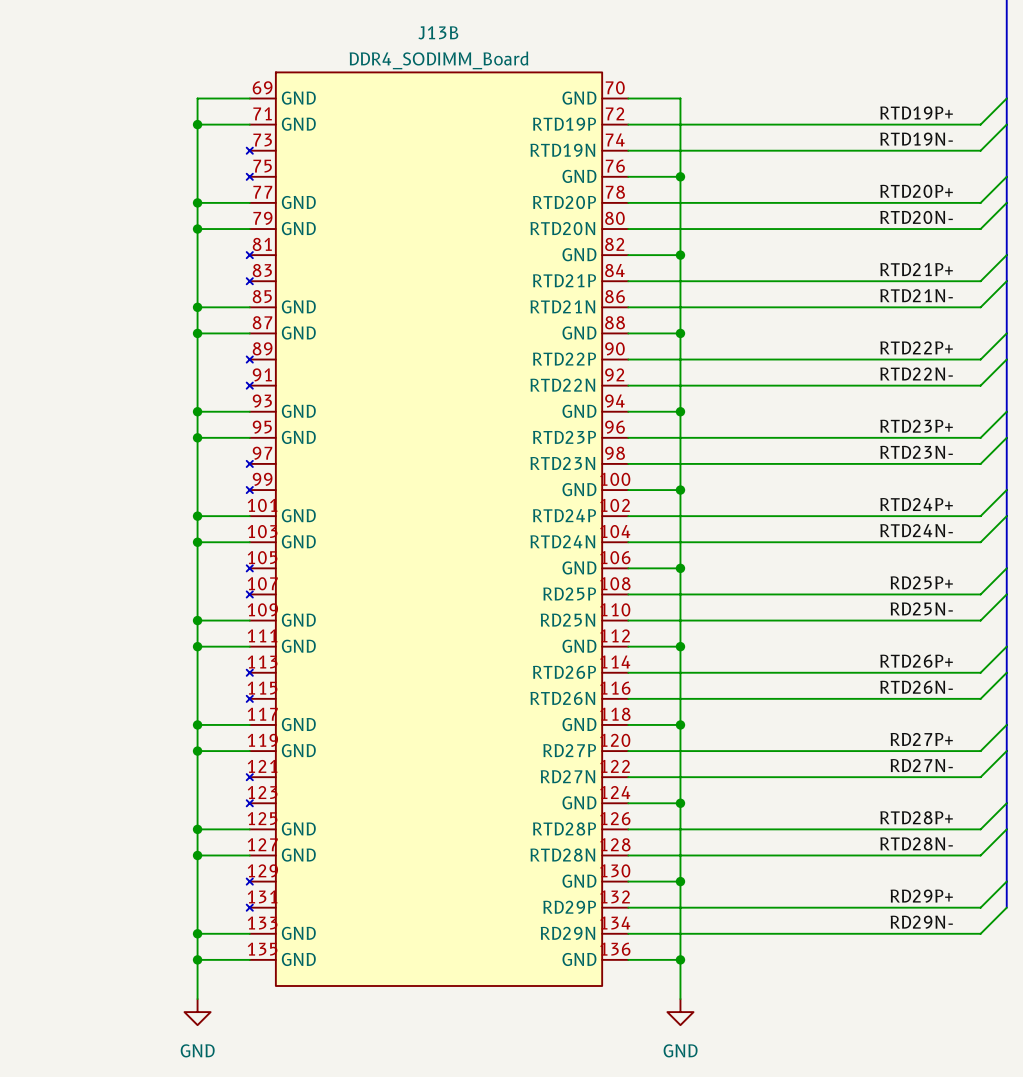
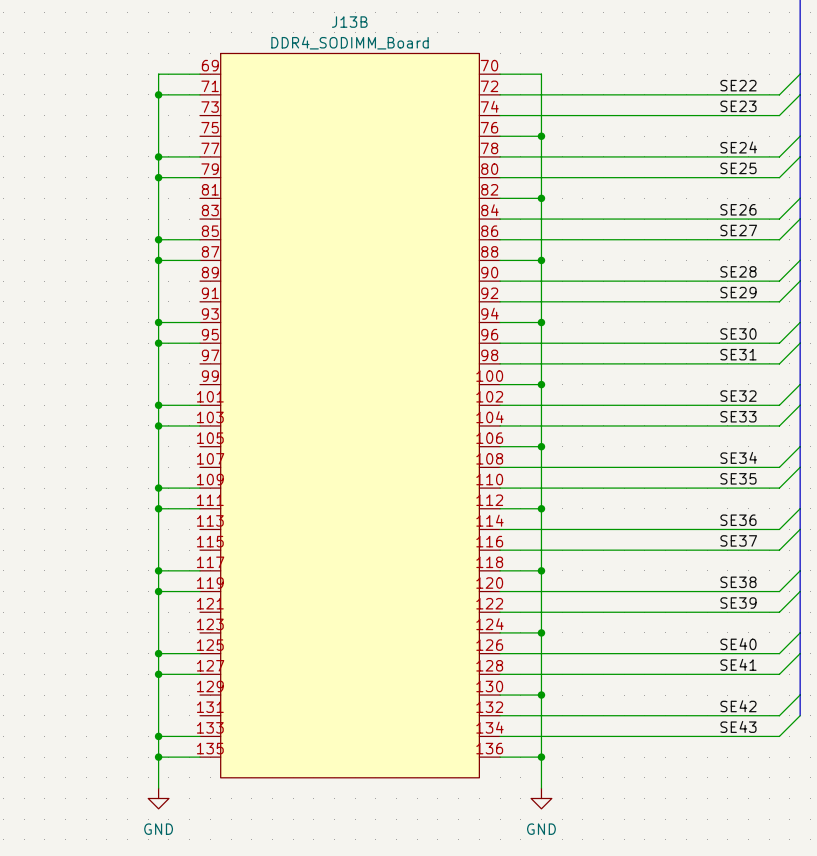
J13B symbol: [246, 72, 629, 986] -> [199, 53, 501, 778]
label: RTD19P+ (916, 113) -> SE22 (738, 85)
label: RTD19N- (916, 139) -> SE23 (738, 106)
label: RTD20P+ (916, 191) -> SE24 (738, 147)
label: RTD20N- (916, 217) -> SE25 (738, 168)
label: RTD21P+ (916, 269) -> SE26 (738, 209)
label: RTD21N- (916, 295) -> SE27 (738, 230)
label: RTD22P+ (916, 347) -> SE28 (738, 271)
label: RTD22N- (916, 373) -> SE29 (738, 292)
label: RTD23P+ (916, 426) -> SE30 (738, 333)
label: RTD23N- (916, 452) -> SE31 (738, 354)
label: RTD24P+ (916, 504) -> SE32 (738, 396)
label: RTD24N- (916, 530) -> SE33 (738, 416)
label: RD25P+ (921, 582) -> SE34 (738, 457)
label: RD25N- (921, 608) -> SE35 (738, 478)
label: RTD26P+ (916, 661) -> SE36 (738, 520)
label: RTD26N- (916, 687) -> SE37 (738, 540)
label: RD27P+ (921, 739) -> SE38 (738, 582)
label: RD27N- (921, 765) -> SE39 (738, 603)
label: RTD28P+ (916, 817) -> SE40 (738, 644)
label: RTD28N- (916, 843) -> SE41 (738, 664)
label: RD29P+ (921, 896) -> SE42 (738, 706)
label: RD29N- (921, 922) -> SE43 (738, 726)

